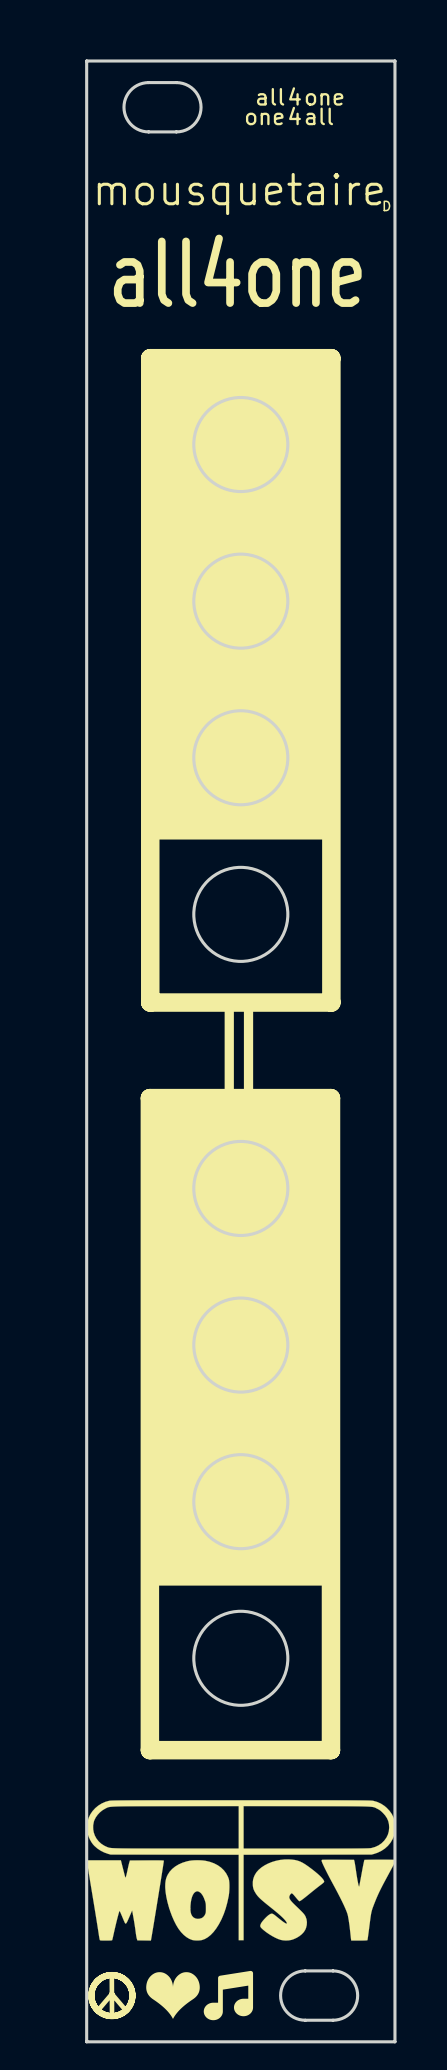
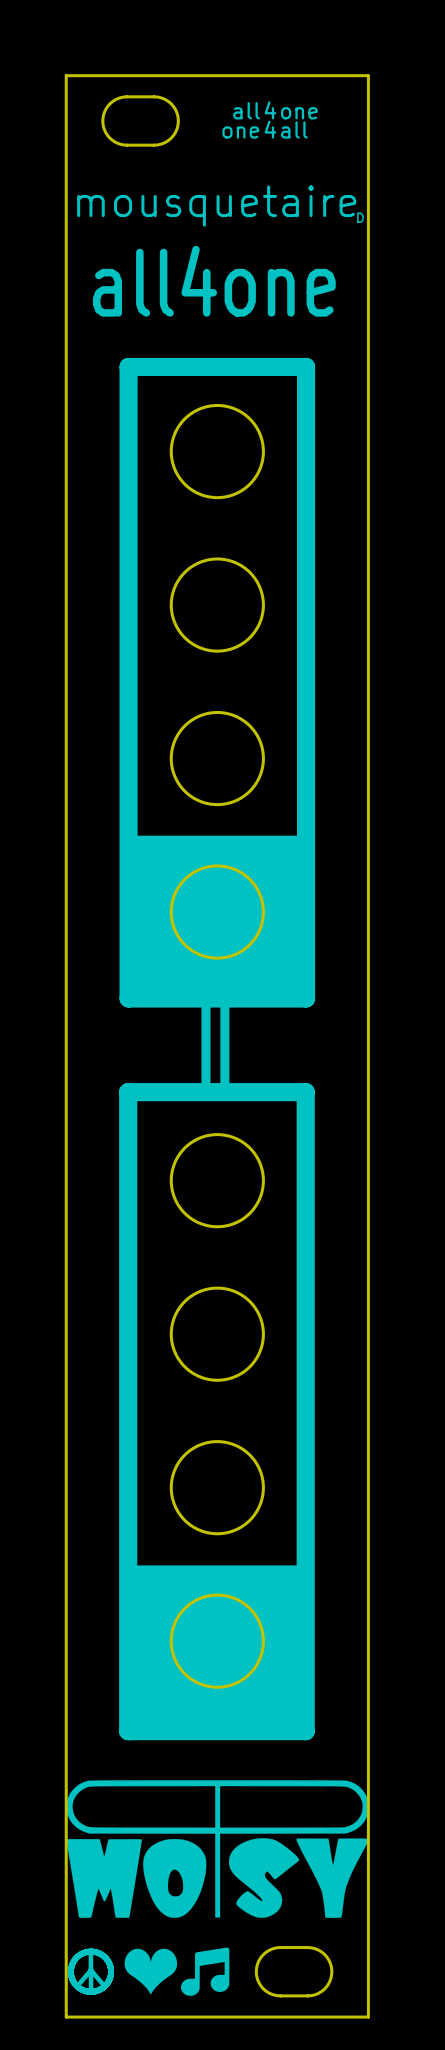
drawing: [152, 362, 329, 840] -> none
drawing: none -> [131, 835, 304, 997]
drawing: [152, 1105, 329, 1586] -> none
drawing: none -> [129, 1565, 302, 1730]

